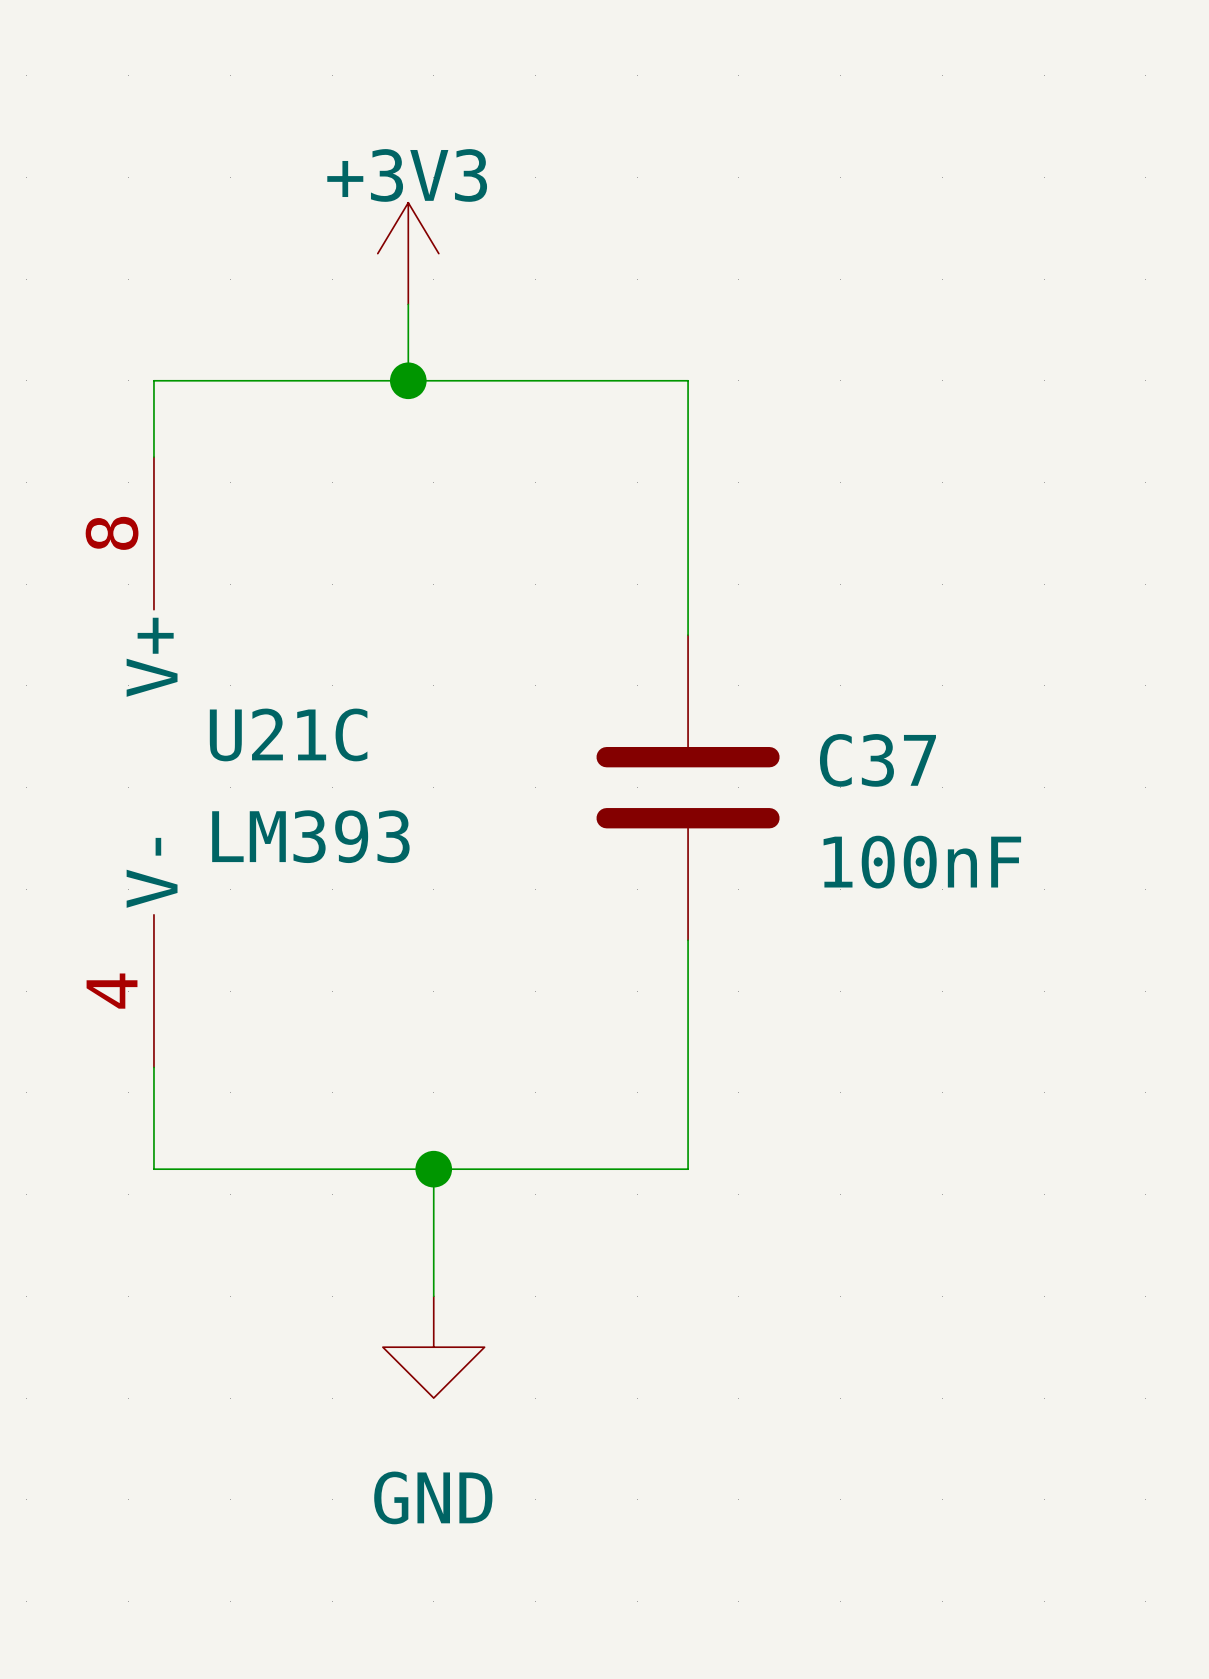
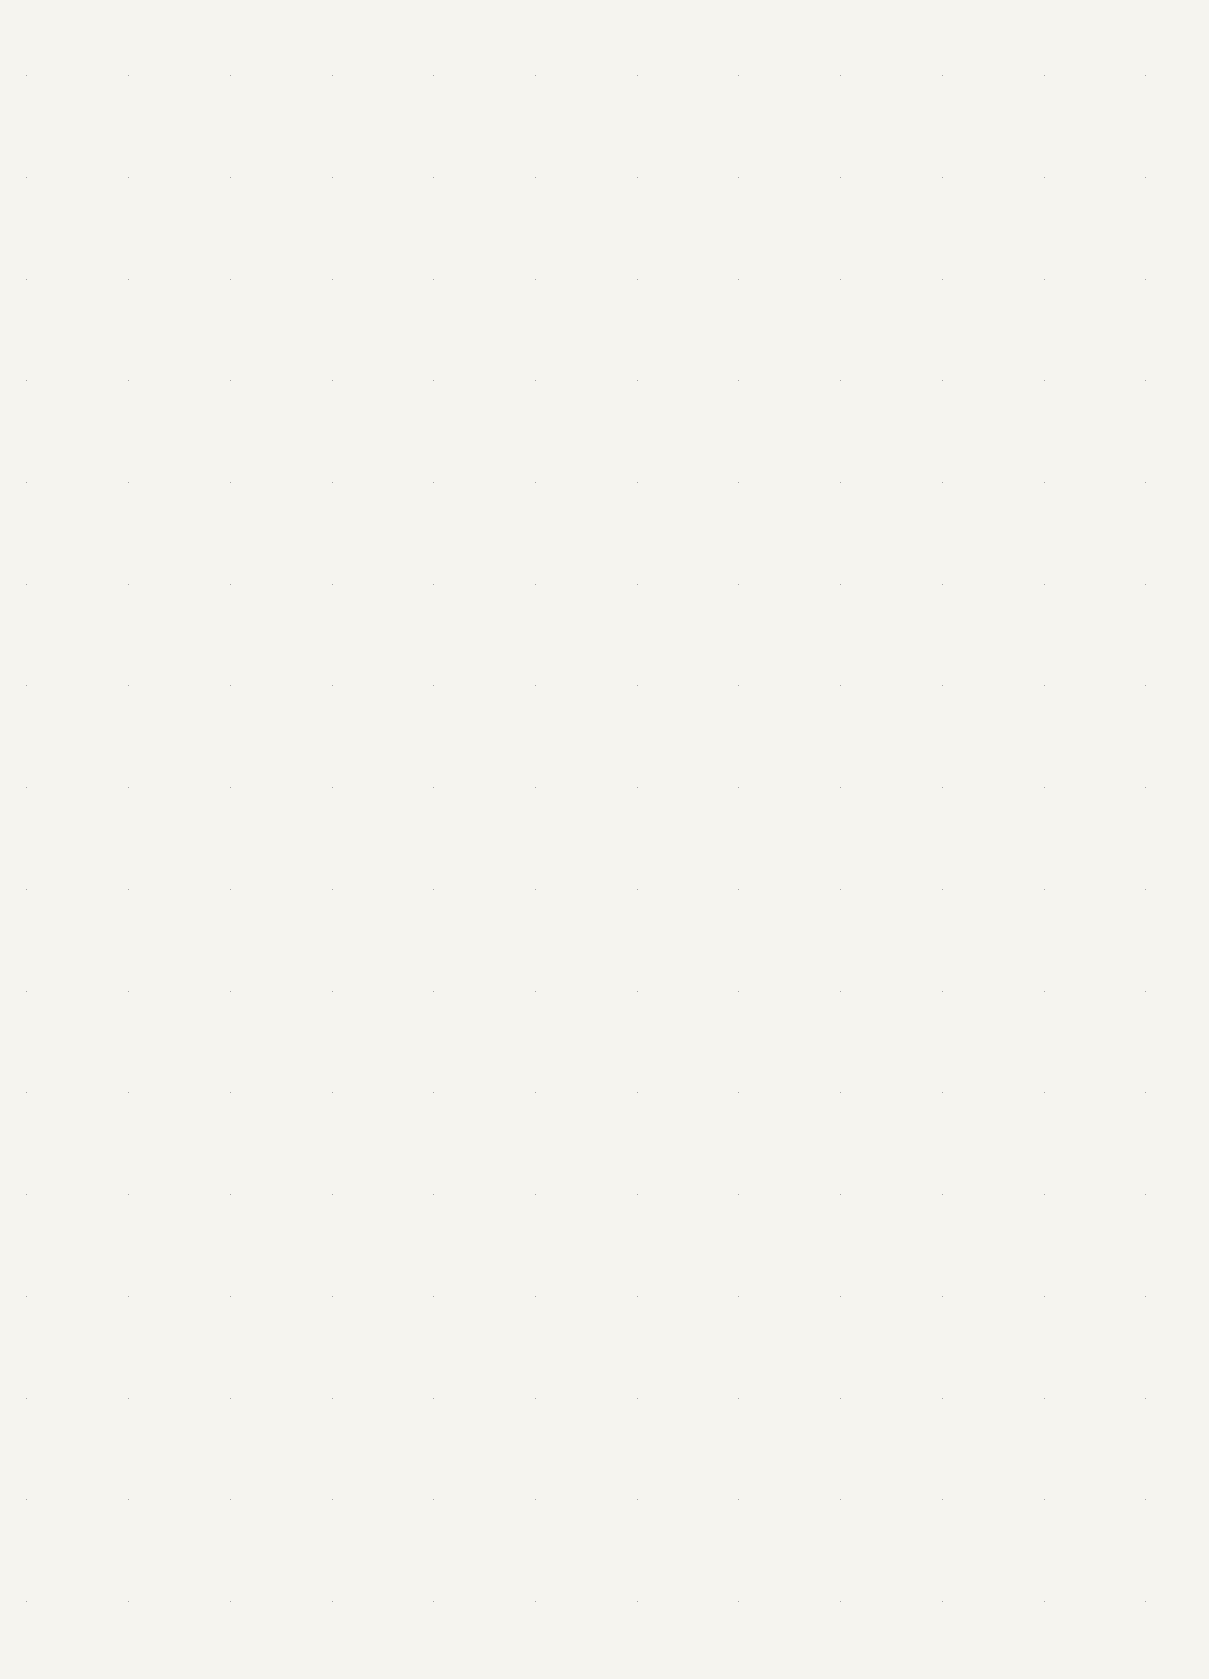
power symbol: +3V3 (408, 253) -> none
wire: (408, 304) (408, 380) -> none
junction: (408, 380) -> none
wire: (153, 457) (153, 380) (688, 380) (688, 635) -> none
U21C: LM393 (153, 762) -> none
C37: 100nF (688, 787) -> none
wire: (688, 940) (688, 1169) (153, 1169) (153, 1067) -> none
wire: (433, 1169) (433, 1296) -> none
junction: (433, 1169) -> none
power symbol: GND (433, 1347) -> none

